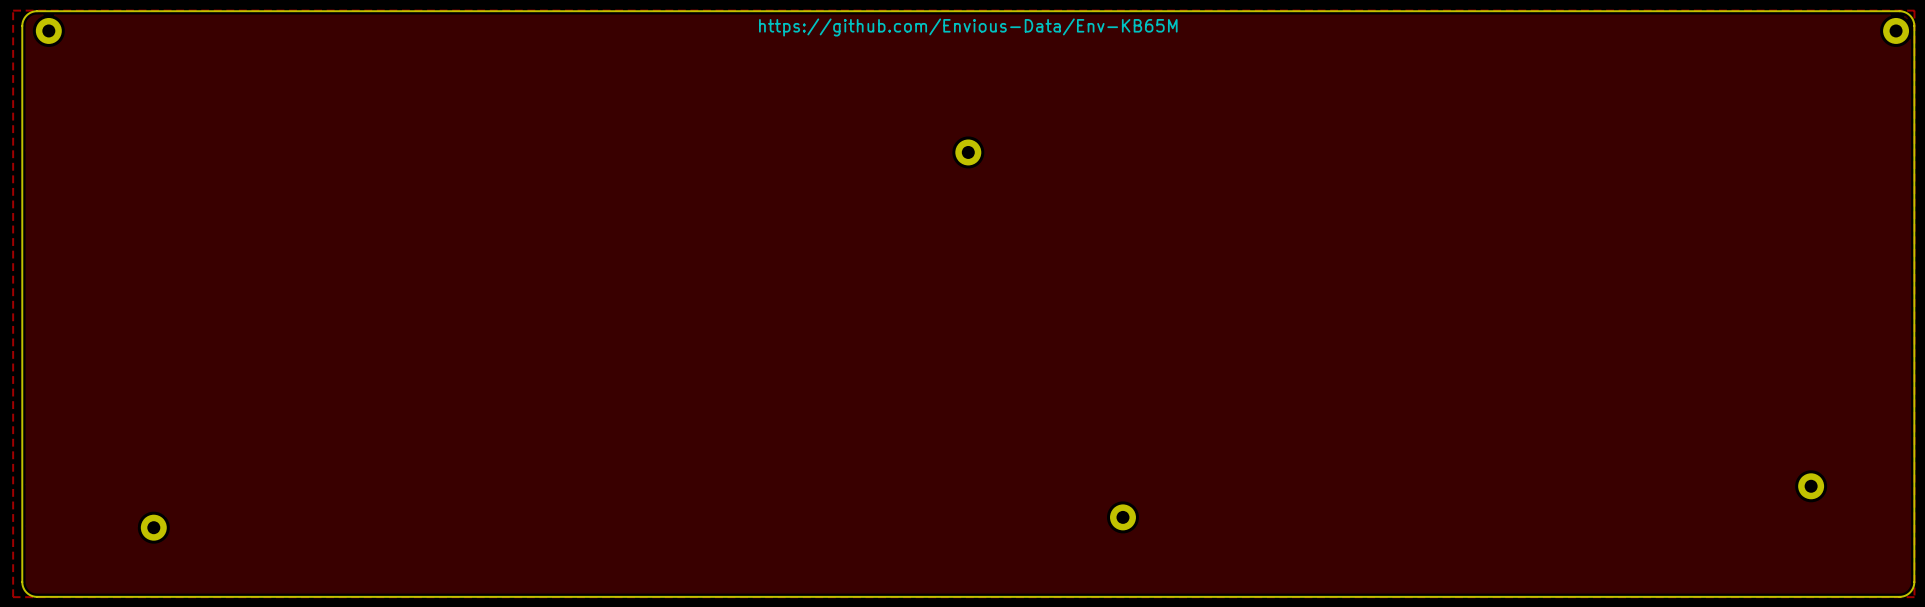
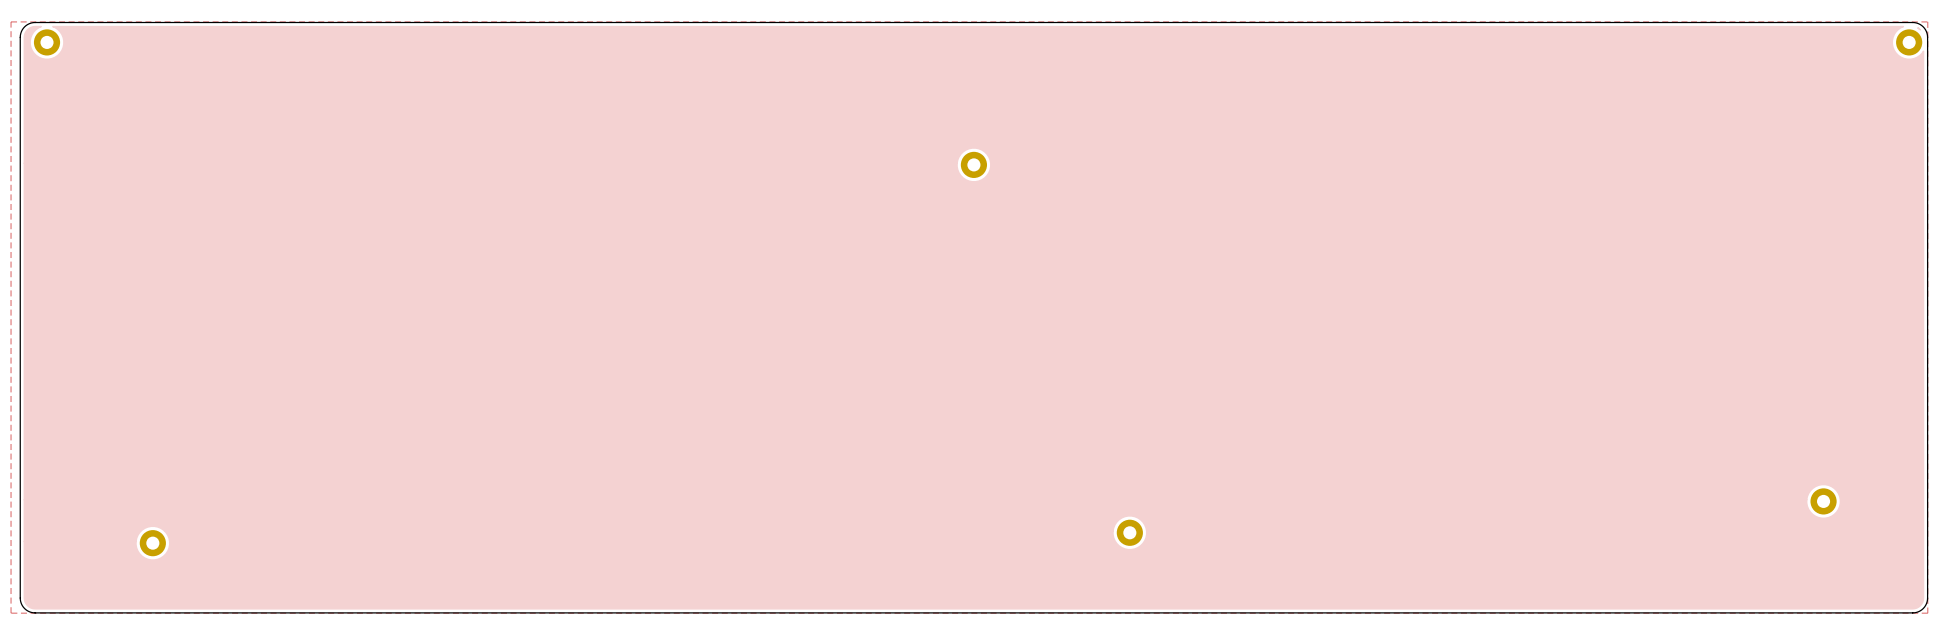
text: https://github.com/Envious-Data/Env-KB65M (968, 27) -> none

